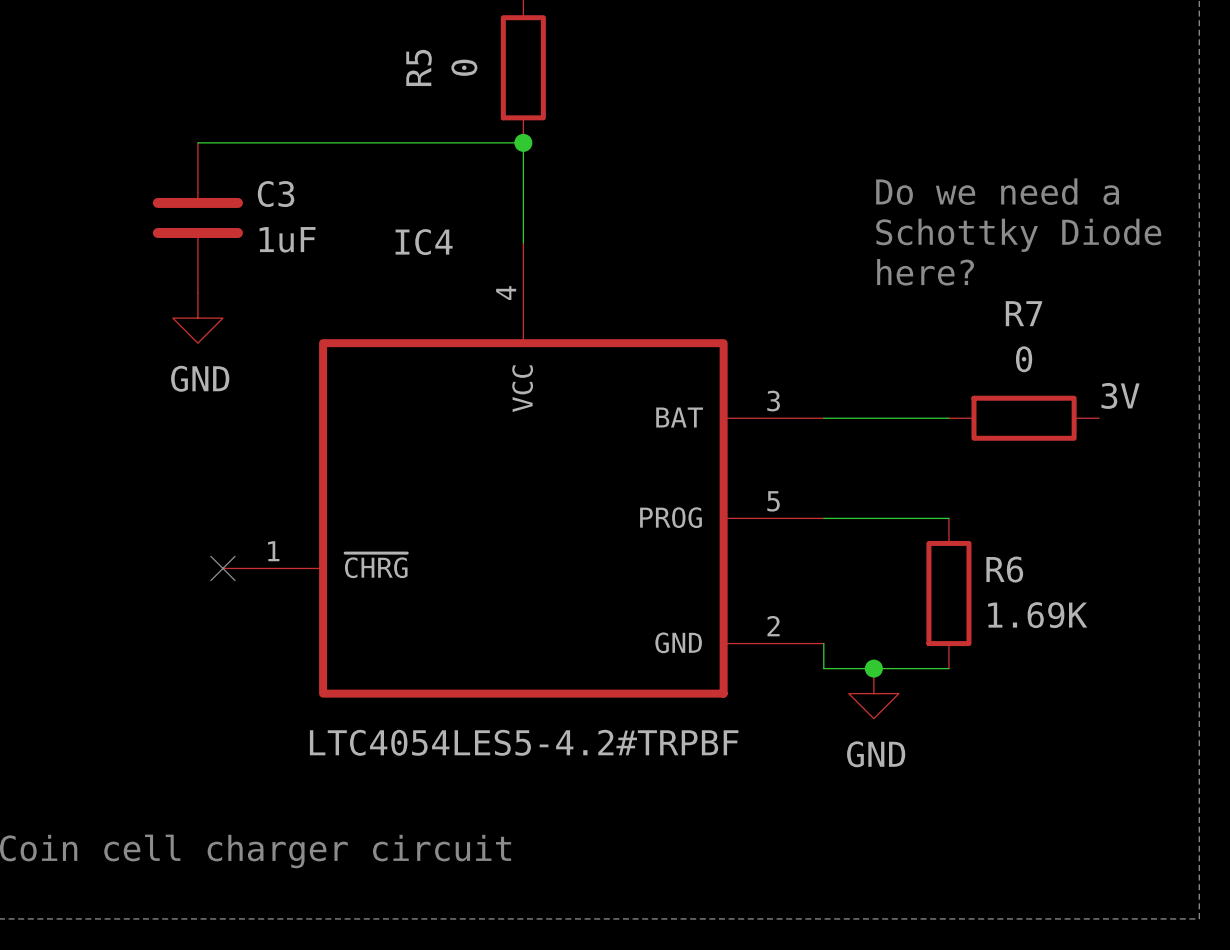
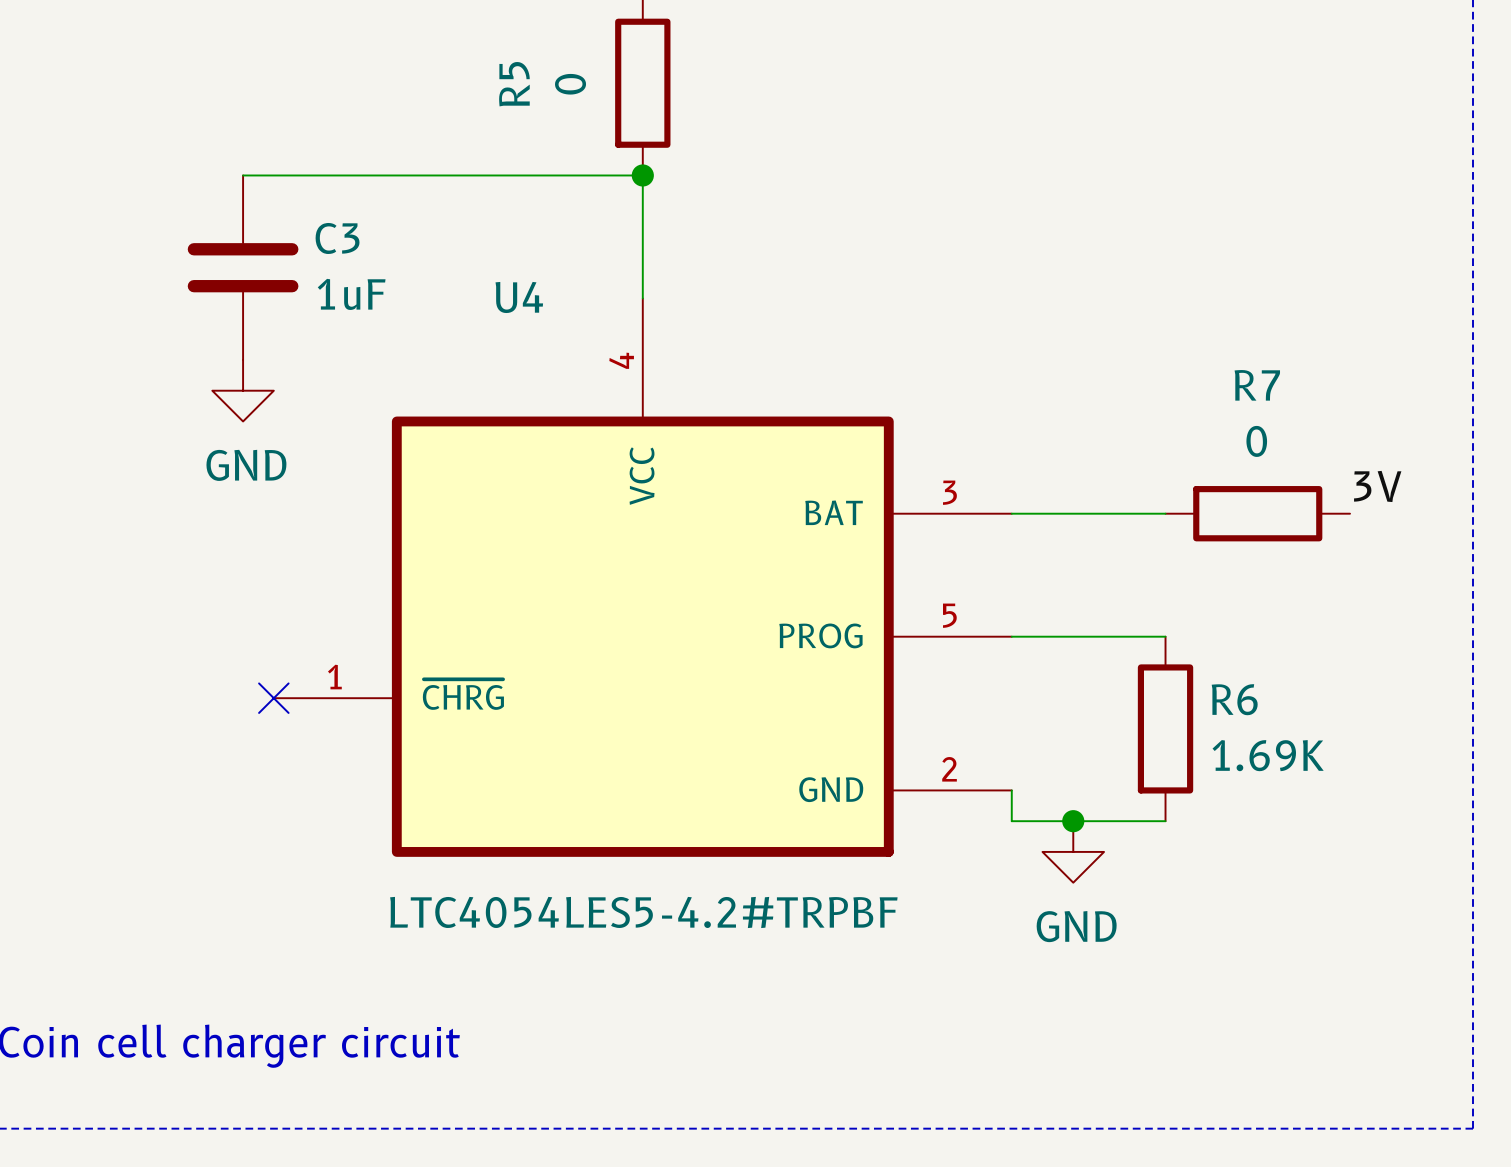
text: Do we need a (997, 191) -> none
text: Schottky Diode (1018, 235) -> none
IC4 name: IC4 (424, 242) -> U4 (519, 297)
text: here? (925, 272) -> none

